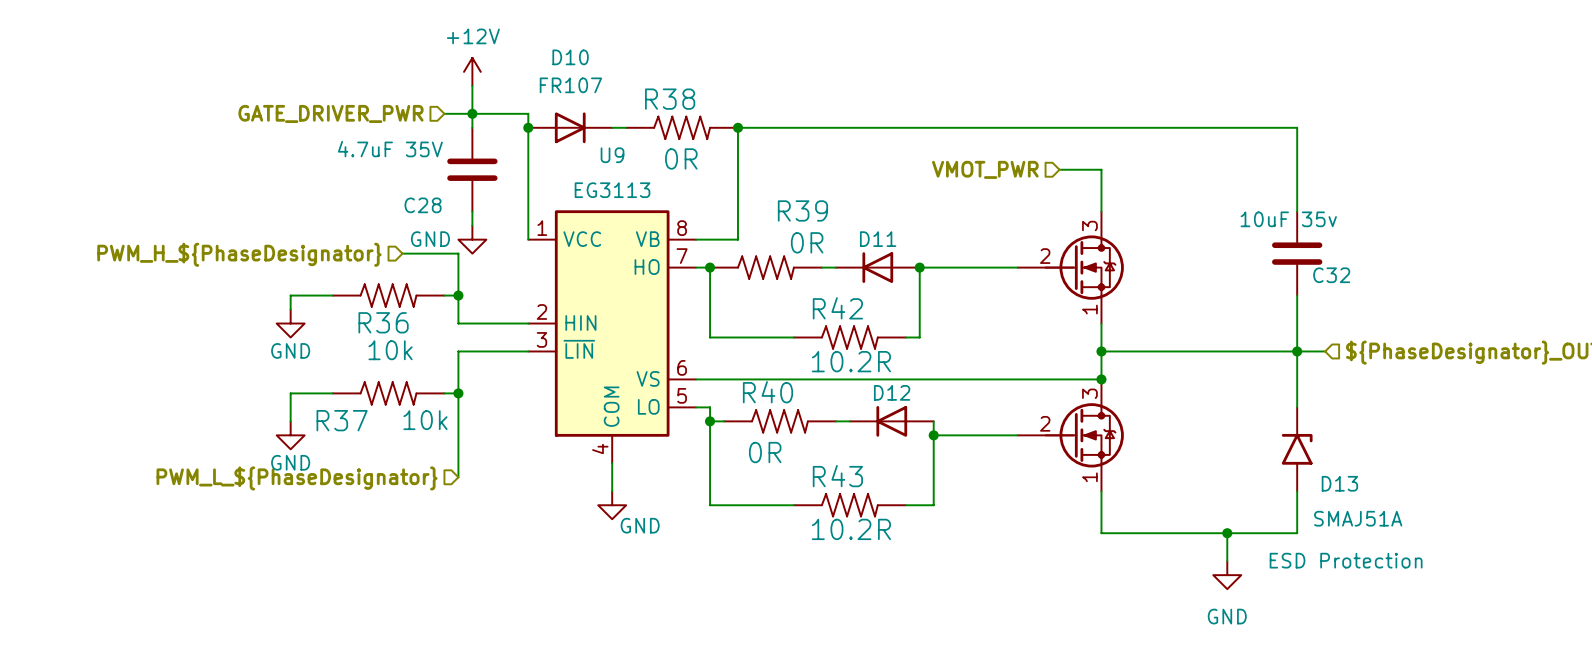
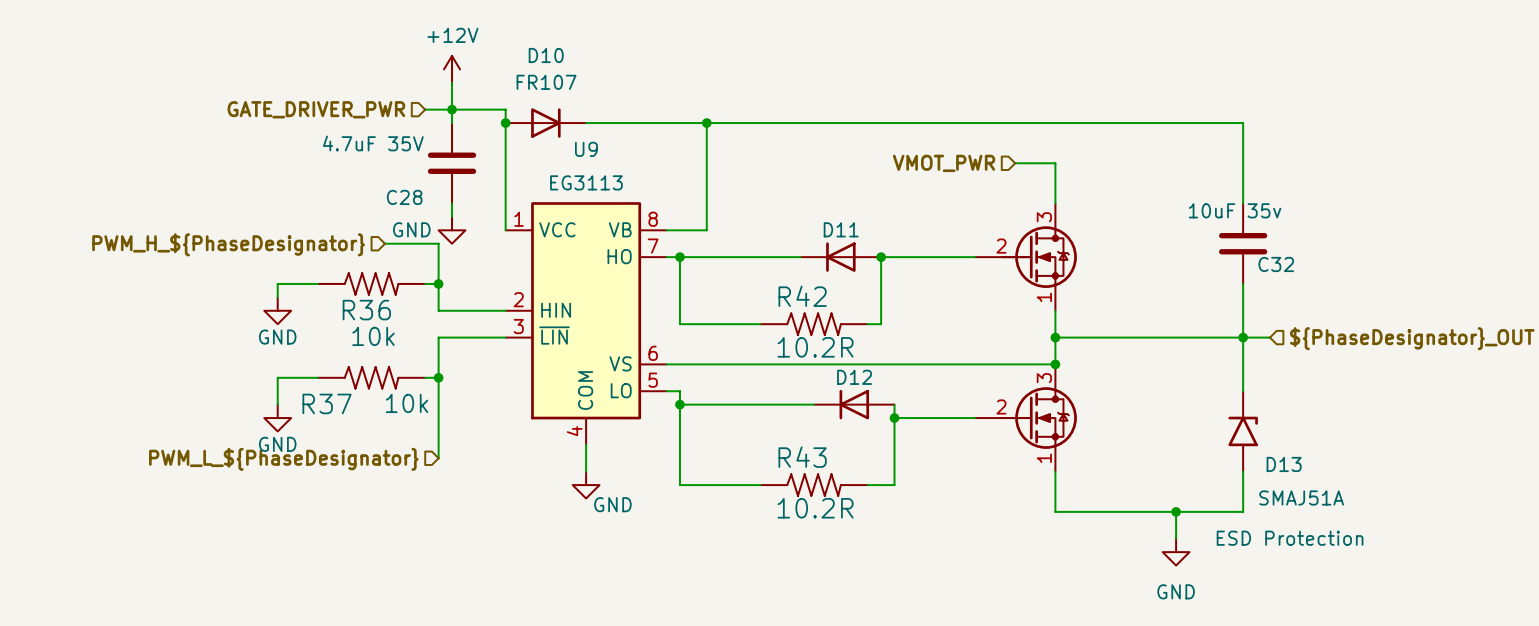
R38: 0R (682, 127) -> none
R39: 0R (765, 267) -> none
R40: 0R (779, 421) -> none

